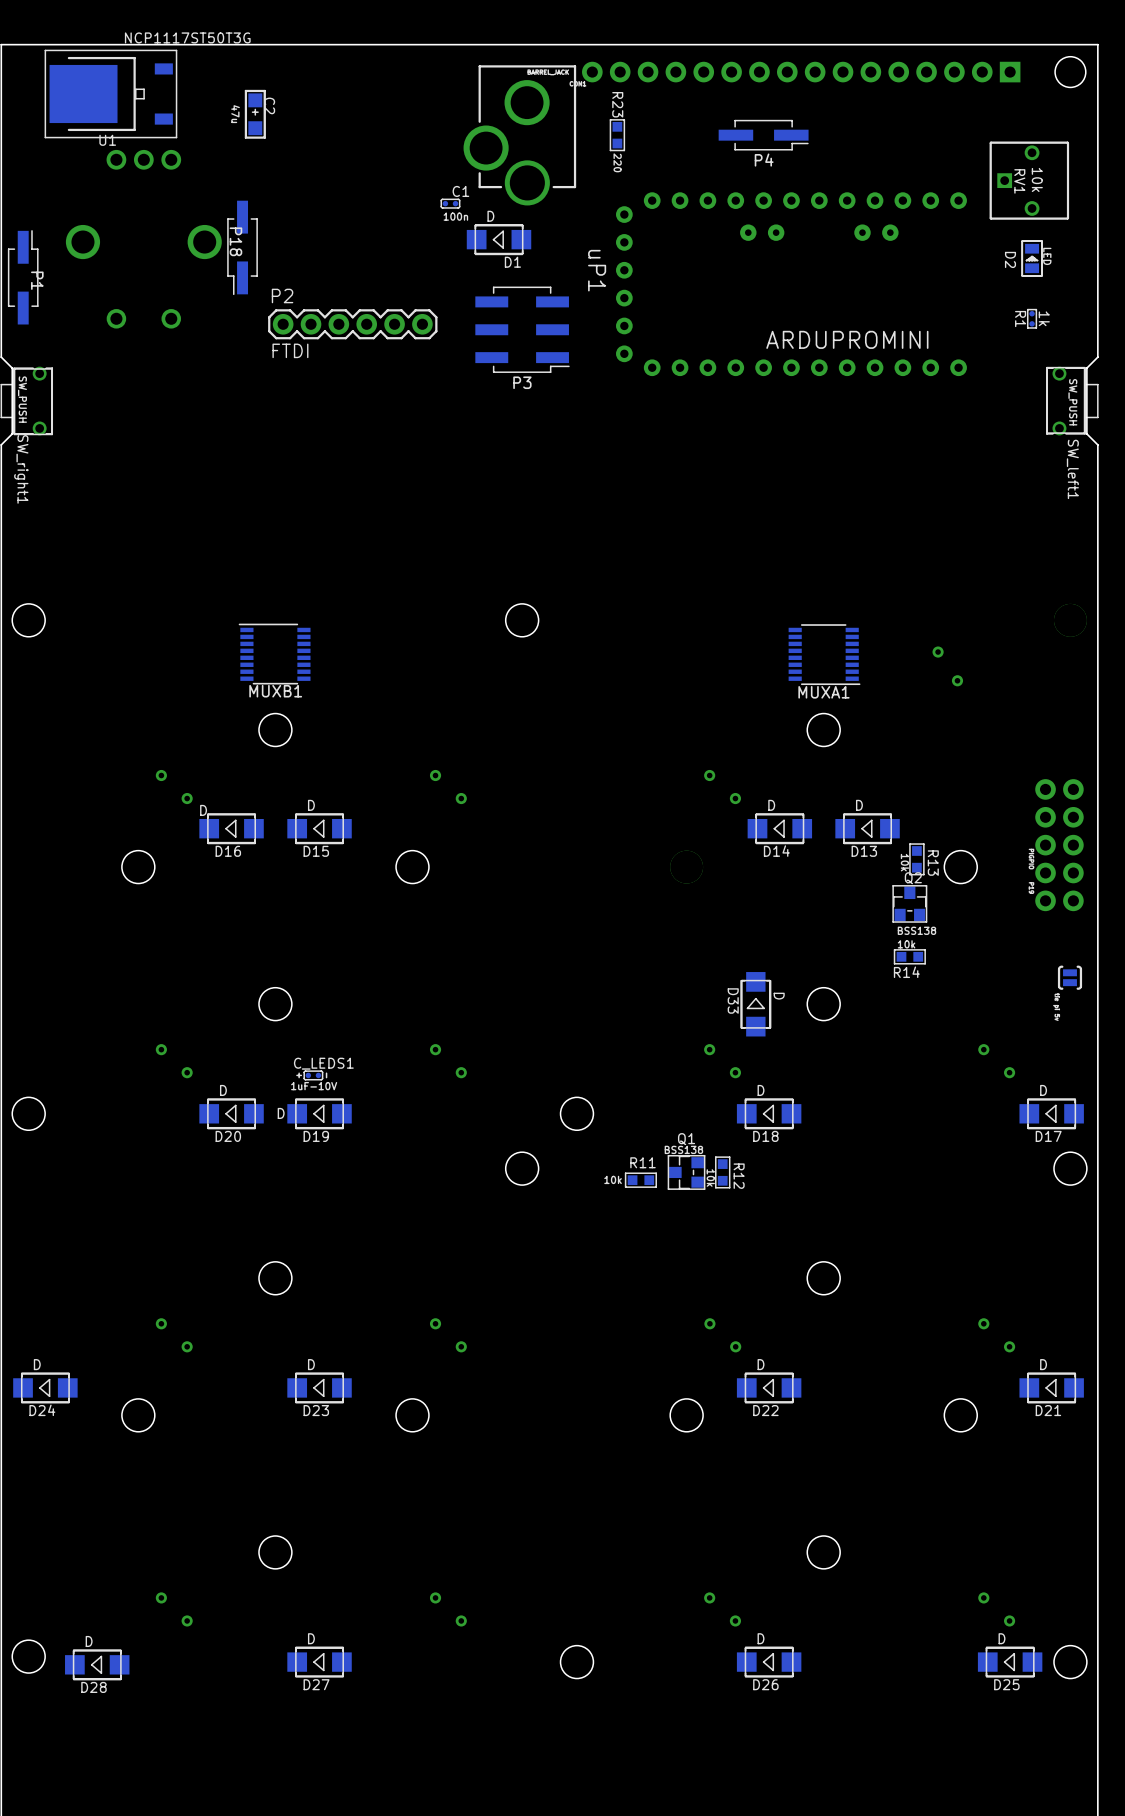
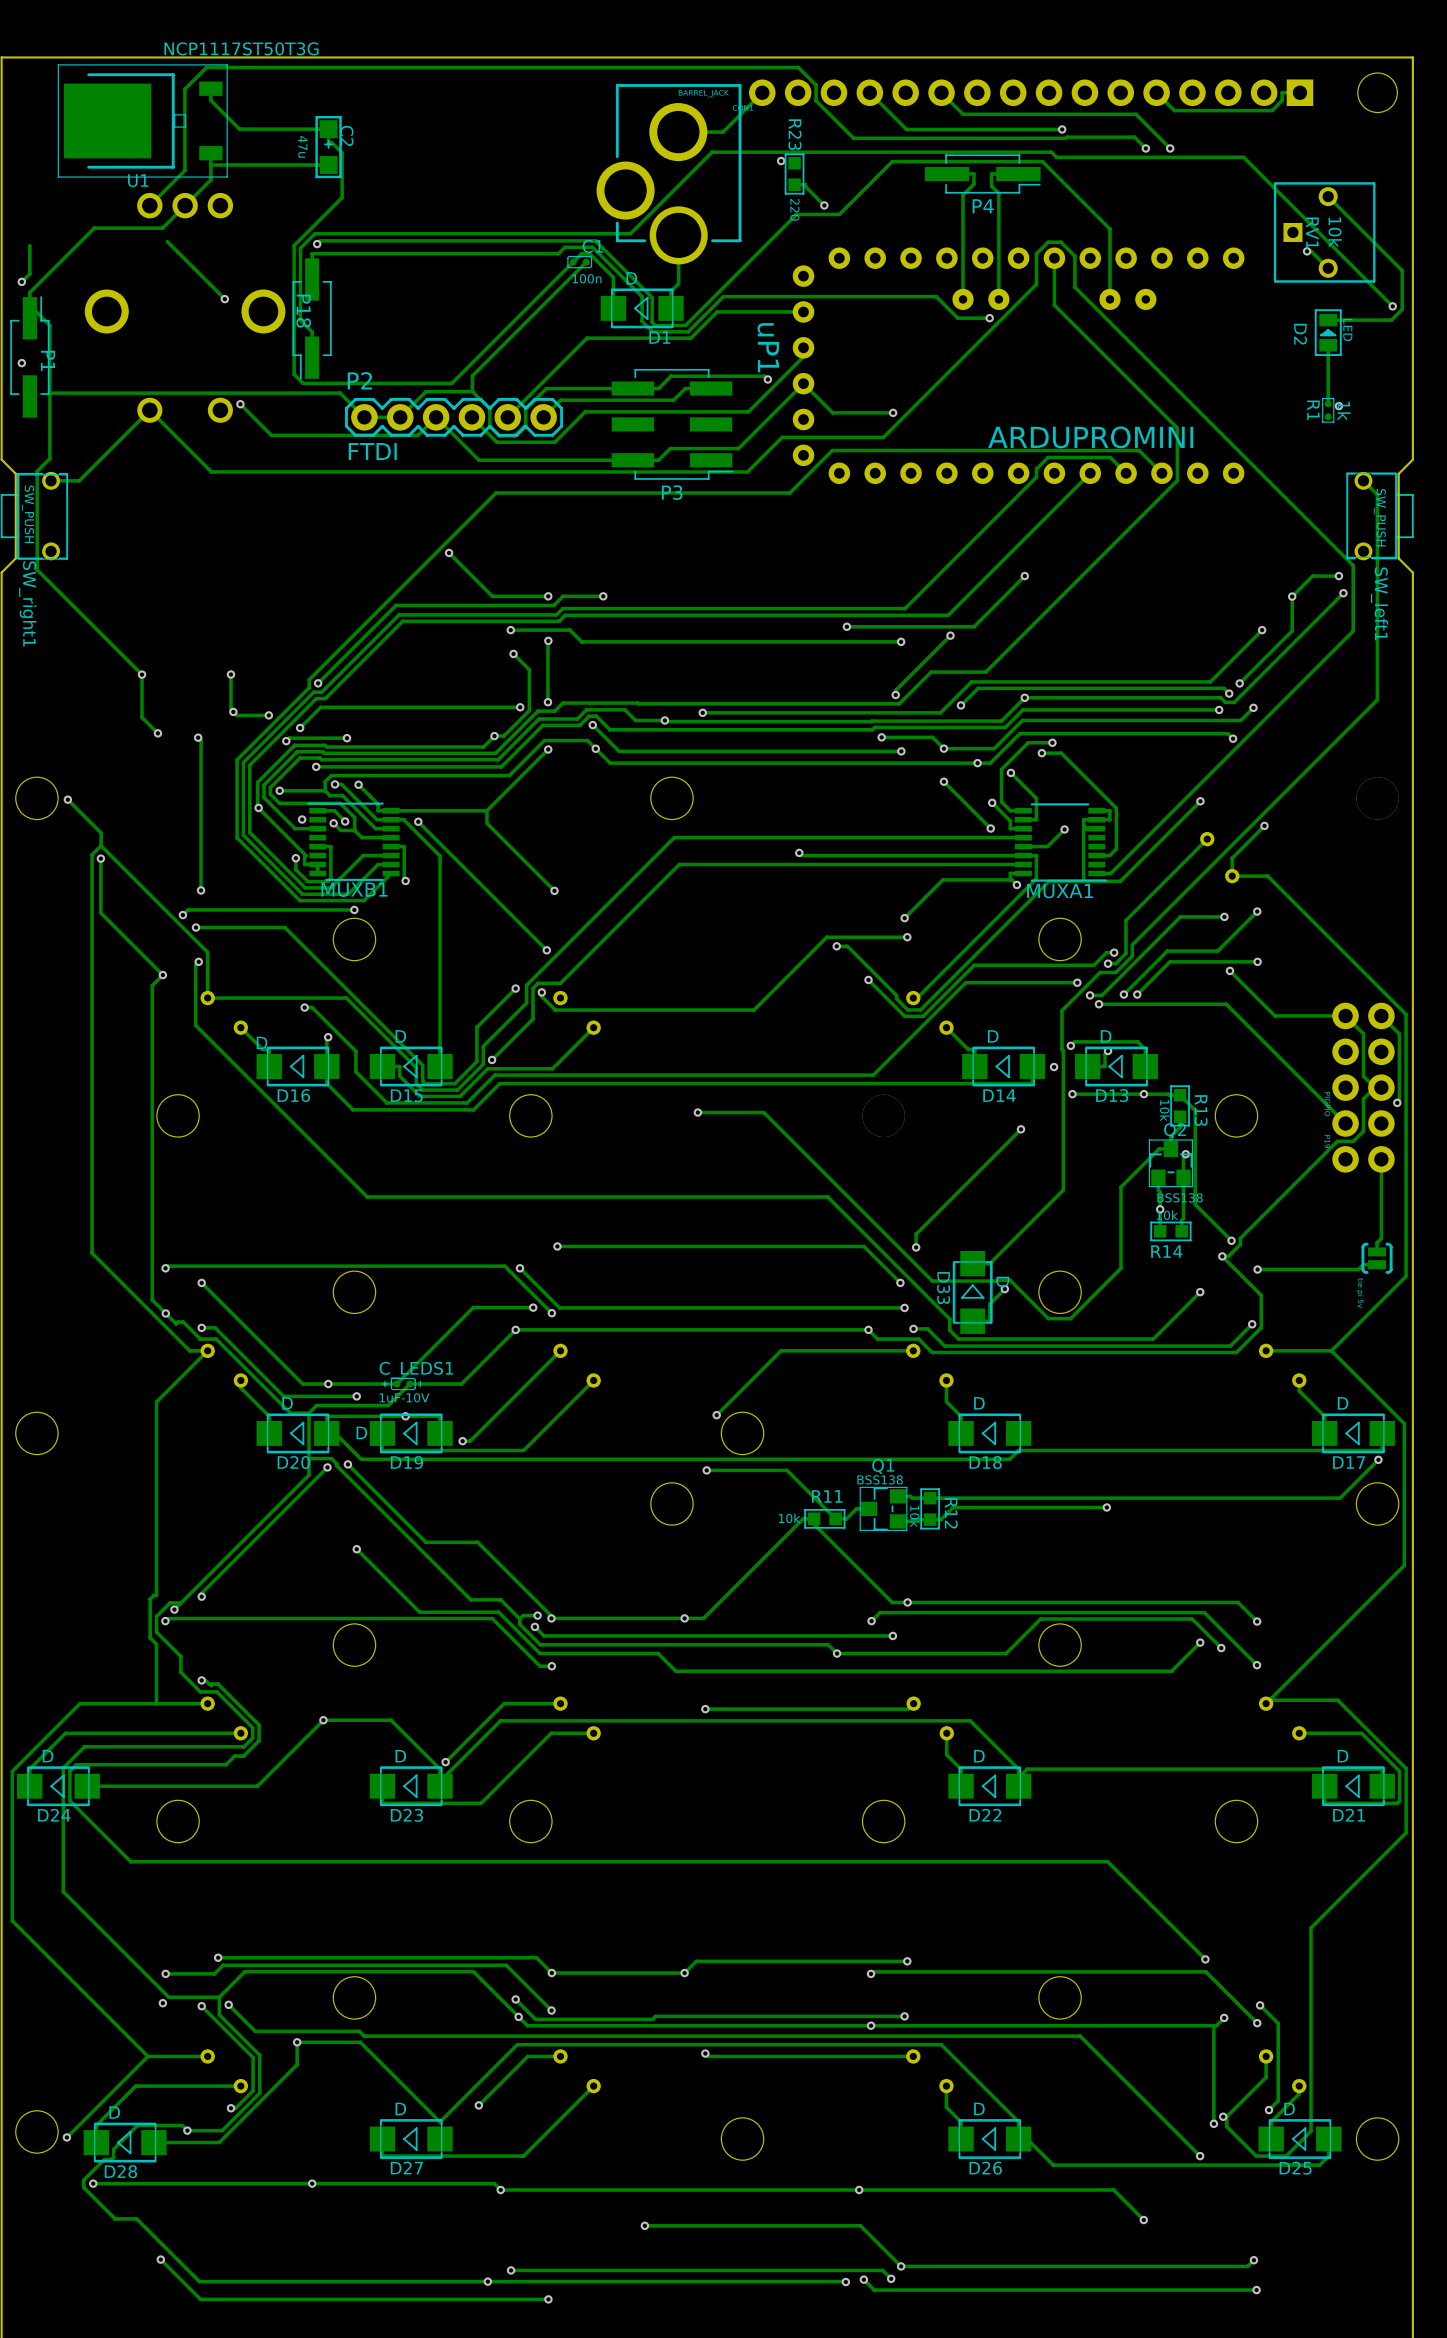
track: none -> (210, 88) (210, 100) (239, 129) (328, 129) (328, 142) (331, 142) (342, 152) (342, 197) (294, 245) (294, 374) (303, 383) (451, 383) (581, 253) (589, 253) (613, 277) (613, 308)
track: none -> (762, 92) (722, 132) (678, 132)
track: none -> (869, 92) (906, 129) (1062, 129)
track: none -> (941, 92) (963, 114) (1135, 114) (1170, 148)
track: none -> (1299, 92) (1282, 92) (1282, 100) (1272, 110) (1174, 110) (1156, 92)
via: none -> (1062, 129)
track: none -> (1145, 148) (1134, 137) (853, 138) (816, 100) (816, 85) (798, 67) (206, 67) (184, 89) (184, 170) (149, 205)
via: none -> (1145, 148)
via: none -> (1170, 148)
track: none -> (210, 153) (210, 179) (162, 228) (94, 228) (29, 292) (29, 318)
via: none -> (781, 161)
track: none -> (328, 165) (210, 165)
track: none -> (947, 173) (973, 173) (973, 184) (963, 195) (963, 299)
track: none -> (1018, 173) (991, 173) (991, 186) (998, 193) (998, 299)
track: none -> (794, 184) (805, 184) (824, 205)
track: none -> (1328, 196) (1402, 270) (1402, 309) (1391, 320) (1328, 320)
via: none -> (824, 205)
track: none -> (678, 235) (678, 283) (670, 291) (670, 308)
track: none -> (167, 241) (224, 299)
track: none -> (317, 244) (320, 240) (595, 240) (652, 297) (652, 322) (655, 325) (685, 325) (796, 214) (839, 214) (892, 161) (1042, 161) (1109, 229) (1109, 299)
via: none -> (317, 244)
track: none -> (29, 245) (29, 273) (21, 281)
track: none -> (1307, 251) (1311, 251) (1328, 268)
via: none -> (1307, 251)
track: none -> (1054, 258) (1054, 305) (1177, 428) (1177, 480) (985, 672) (931, 672) (899, 703) (562, 703) (554, 711) (537, 711) (495, 753) (297, 751) (264, 784) (264, 797) (295, 828) (317, 828)
track: none -> (586, 262) (472, 375) (472, 391)
track: none -> (312, 279) (312, 253) (558, 253) (564, 247) (592, 247) (642, 296) (642, 321) (652, 331) (688, 331) (723, 296) (936, 296) (957, 318) (989, 318)
via: none -> (21, 281)
via: none -> (224, 299)
track: none -> (29, 305) (49, 325) (49, 458) (37, 471) (37, 569) (142, 674) (142, 717) (157, 733)
track: none -> (1392, 306) (1243, 157) (1056, 157) (1051, 152) (712, 152) (630, 233) (315, 233) (300, 248) (300, 320) (312, 331) (312, 357)
via: none -> (1392, 306)
track: none -> (803, 311) (717, 311) (690, 338) (586, 338) (507, 417)
via: none -> (989, 318)
track: none -> (1328, 345) (1328, 403)
track: none -> (803, 347) (803, 356) (748, 411) (585, 411) (554, 442) (496, 442) (471, 417)
via: none -> (21, 363)
track: none -> (767, 379) (764, 376) (670, 376) (658, 388) (546, 388) (525, 409) (525, 424) (514, 435) (499, 435) (489, 426) (489, 409) (472, 391)
via: none -> (767, 379)
track: none -> (711, 388) (685, 388) (673, 400) (560, 400) (543, 417)
track: none -> (472, 391) (425, 391) (400, 417) (364, 417) (340, 393) (49, 393)
track: none -> (240, 404) (271, 435) (418, 435) (436, 417) (479, 460) (658, 460) (670, 448) (738, 448) (803, 383) (832, 412) (893, 412)
via: none -> (240, 404)
via: none -> (1338, 406)
via: none -> (893, 412)
track: none -> (1090, 473) (948, 615) (565, 615) (559, 621) (402, 621) (325, 698) (316, 698) (249, 765) (249, 832) (305, 887) (330, 887) (363, 855) (391, 855)
track: none -> (1126, 473) (1110, 457) (1048, 457) (1036, 469) (1036, 477) (905, 608) (562, 608) (556, 614) (399, 614) (321, 692) (313, 692) (243, 762) (243, 835) (302, 894) (348, 894) (378, 864) (391, 864)
track: none -> (1161, 473) (1139, 450) (832, 450) (789, 492) (495, 492) (309, 679) (309, 687) (237, 759) (237, 837) (299, 900) (364, 900) (391, 873)
track: none -> (51, 480) (79, 480) (149, 410) (211, 471) (747, 471) (782, 437) (883, 437) (1036, 284) (1036, 253) (1048, 242) (1060, 242) (1074, 256) (1074, 287) (1353, 565) (1353, 631) (1110, 873) (1096, 873)
track: none -> (1363, 480) (1377, 494) (1377, 699) (1132, 944) (1132, 956) (1115, 972) (1100, 972) (1061, 1010) (1063, 1190) (989, 1263) (972, 1263)
track: none -> (449, 552) (492, 596) (548, 596)
via: none -> (449, 552)
track: none -> (1024, 576) (974, 626) (846, 626)
via: none -> (1024, 576)
track: none -> (1338, 576) (1312, 576) (1292, 596) (1292, 630) (1239, 683)
via: none -> (1338, 576)
track: none -> (1343, 593) (1234, 702) (1225, 702) (1220, 697) (1024, 697) (1001, 721) (666, 721) (635, 720) (624, 709) (586, 709) (577, 718) (538, 718) (498, 759) (299, 758) (270, 787) (270, 794) (279, 803) (340, 803) (354, 817) (354, 830)
via: none -> (1343, 593)
via: none -> (548, 596)
track: none -> (603, 596) (562, 596) (553, 605) (396, 605) (318, 683)
via: none -> (603, 596)
via: none -> (1292, 596)
via: none -> (846, 626)
track: none -> (510, 630) (569, 630) (581, 641) (901, 641)
via: none -> (510, 630)
track: none -> (1262, 630) (1210, 681) (971, 681) (940, 712) (702, 712)
via: none -> (1262, 630)
track: none -> (950, 635) (895, 690) (895, 694)
via: none -> (950, 635)
track: none -> (548, 640) (547, 702)
via: none -> (548, 640)
via: none -> (901, 641)
track: none -> (513, 653) (529, 669) (529, 710) (503, 736) (494, 736) (483, 746) (294, 745) (257, 782) (257, 806) (305, 855) (304, 864) (317, 864) (317, 873)
via: none -> (513, 653)
via: none -> (142, 674)
track: none -> (230, 674) (230, 709) (236, 715) (268, 715)
via: none -> (230, 674)
via: none -> (318, 683)
via: none -> (1239, 683)
track: none -> (1229, 693) (1223, 688) (978, 688) (960, 705)
via: none -> (1229, 693)
via: none -> (895, 694)
via: none -> (1024, 697)
via: none -> (547, 702)
via: none -> (960, 705)
track: none -> (520, 707) (320, 707) (300, 727)
via: none -> (520, 707)
track: none -> (1253, 707) (1240, 720) (1022, 720) (994, 748) (943, 748) (932, 737) (881, 737)
via: none -> (1253, 707)
track: none -> (1219, 709) (1022, 709) (1005, 727) (874, 727) (872, 729) (610, 729) (596, 716) (589, 716) (579, 725) (542, 725) (501, 766) (316, 766)
via: none -> (1219, 709)
via: none -> (233, 711)
via: none -> (702, 712)
via: none -> (268, 715)
via: none -> (664, 720)
track: none -> (592, 725) (619, 751) (901, 751)
via: none -> (592, 725)
via: none -> (300, 727)
via: none -> (157, 733)
via: none -> (494, 736)
via: none -> (881, 737)
track: none -> (198, 737) (201, 740) (201, 890)
via: none -> (198, 737)
track: none -> (347, 738) (289, 738) (286, 741)
via: none -> (347, 738)
track: none -> (1233, 738) (1228, 733) (1019, 733) (990, 763) (610, 763) (587, 740) (544, 740) (509, 775) (331, 775) (325, 781) (325, 790)
via: none -> (1233, 738)
via: none -> (286, 741)
track: none -> (1052, 742) (1028, 742) (1001, 769) (1001, 801) (1010, 810) (1023, 810)
via: none -> (1052, 742)
via: none -> (595, 748)
via: none -> (943, 748)
track: none -> (548, 749) (486, 810)
via: none -> (548, 749)
via: none -> (901, 751)
track: none -> (1041, 753) (1061, 753) (1116, 808) (1116, 848) (1109, 855) (1096, 855)
via: none -> (1041, 753)
via: none -> (977, 763)
via: none -> (316, 766)
track: none -> (1010, 772) (1036, 798) (1036, 819) (1023, 819)
via: none -> (1010, 772)
track: none -> (943, 781) (990, 828)
via: none -> (943, 781)
track: none -> (335, 784) (341, 784) (377, 819) (404, 819) (440, 855) (440, 1066)
via: none -> (335, 784)
track: none -> (358, 784) (378, 804) (378, 810) (486, 810)
via: none -> (358, 784)
via: none -> (279, 790)
track: none -> (325, 790) (279, 790)
track: none -> (325, 790) (330, 795) (342, 795) (375, 828) (391, 828)
track: none -> (67, 799) (101, 832) (101, 845)
via: none -> (67, 799)
track: none -> (1200, 801) (1120, 881) (1049, 881) (920, 1009) (907, 1009) (896, 998) (896, 995) (847, 946) (836, 946)
via: none -> (1200, 801)
track: none -> (992, 802) (1010, 820) (1010, 828) (1023, 828)
via: none -> (992, 802)
via: none -> (258, 807)
track: none -> (317, 810) (334, 810) (345, 821)
track: none -> (486, 810) (486, 823) (554, 890)
track: none -> (1096, 810) (1109, 810) (1109, 819) (1083, 819) (1083, 825) (1086, 828)
via: none -> (302, 819)
via: none -> (345, 821)
track: none -> (418, 821) (546, 950)
via: none -> (418, 821)
track: none -> (333, 823) (340, 830) (354, 830)
via: none -> (333, 823)
track: none -> (1264, 825) (1232, 858) (1232, 876) (1267, 876) (1406, 1014) (1406, 1276) (1331, 1350)
via: none -> (1264, 825)
via: none -> (990, 828)
track: none -> (1096, 828) (1083, 828) (1083, 881)
track: none -> (1064, 829) (1047, 846) (1023, 846)
via: none -> (1064, 829)
track: none -> (354, 830) (361, 837) (391, 837)
track: none -> (1023, 837) (674, 837) (526, 985) (526, 1002) (483, 1046) (483, 1064) (457, 1090) (422, 1090) (416, 1083) (416, 1067) (346, 998) (207, 998) (207, 952) (101, 845)
track: none -> (1207, 839) (1125, 920) (1125, 953) (1115, 963) (1108, 963)
track: none -> (101, 845) (92, 854) (92, 1253) (189, 1350) (207, 1350) (156, 1402) (156, 1595) (150, 1599) (150, 1637) (156, 1644) (156, 1703)
track: none -> (317, 846) (330, 846) (330, 878) (327, 881) (307, 881) (295, 869) (295, 858)
track: none -> (391, 846) (404, 846) (405, 880)
track: none -> (799, 852) (801, 855) (1036, 855) (1036, 878) (917, 998) (913, 998)
via: none -> (799, 852)
via: none -> (295, 858)
track: none -> (100, 858) (100, 913) (162, 975) (152, 985) (152, 1299) (176, 1323) (183, 1322) (199, 1339) (216, 1339) (290, 1413) (309, 1413)
via: none -> (100, 858)
track: none -> (1023, 864) (679, 864) (560, 983) (538, 983) (533, 988) (533, 1019) (492, 1059)
track: none -> (1023, 873) (1010, 873) (1010, 879)
via: none -> (405, 880)
track: none -> (1016, 884) (1011, 879) (942, 879) (904, 918)
via: none -> (1016, 884)
via: none -> (201, 890)
via: none -> (554, 890)
track: none -> (354, 909) (188, 909) (182, 915)
via: none -> (354, 909)
track: none -> (1257, 911) (1217, 951) (1167, 951) (1123, 994)
via: none -> (1257, 911)
via: none -> (182, 915)
track: none -> (1224, 916) (1180, 916) (1102, 995) (1090, 995)
via: none -> (1224, 916)
via: none -> (904, 918)
track: none -> (196, 927) (284, 927) (422, 1065) (422, 1081) (425, 1083) (454, 1083) (476, 1061) (476, 1027) (515, 988)
via: none -> (196, 927)
track: none -> (907, 937) (826, 937) (754, 1010) (555, 1010) (541, 996) (541, 992)
via: none -> (907, 937)
via: none -> (836, 946)
via: none -> (546, 950)
track: none -> (1114, 952) (1106, 952) (1093, 965) (974, 965) (923, 1016) (904, 1016) (868, 979)
via: none -> (1114, 952)
track: none -> (198, 961) (195, 964) (195, 1025) (367, 1197) (827, 1197) (949, 1319) (949, 1330) (958, 1339) (1153, 1339) (1200, 1292)
via: none -> (198, 961)
track: none -> (1257, 961) (1169, 961) (1137, 994)
via: none -> (1257, 961)
via: none -> (1108, 963)
track: none -> (1229, 970) (1275, 1015) (1345, 1015) (1363, 1033) (1363, 1076) (1374, 1087)
via: none -> (1229, 970)
via: none -> (162, 975)
via: none -> (868, 979)
track: none -> (1077, 982) (965, 982) (873, 1075) (494, 1075) (467, 1102) (386, 1102) (355, 1071) (355, 1051) (312, 1007) (304, 1007)
via: none -> (1077, 982)
via: none -> (515, 988)
via: none -> (541, 992)
via: none -> (1123, 994)
via: none -> (1137, 994)
via: none -> (1090, 995)
track: none -> (1098, 1004) (1226, 1004) (1345, 1123)
via: none -> (1098, 1004)
via: none -> (304, 1007)
track: none -> (1381, 1015) (1399, 1033) (1399, 1100) (1397, 1102)
track: none -> (240, 1027) (262, 1049) (269, 1049) (269, 1066)
track: none -> (593, 1027) (552, 1068) (487, 1068) (460, 1096) (419, 1096) (399, 1076) (399, 1066) (382, 1066)
track: none -> (946, 1027) (968, 1049) (974, 1049) (974, 1066)
track: none -> (328, 1037) (326, 1083) (353, 1109) (473, 1109) (499, 1083) (1032, 1083) (1032, 1066)
via: none -> (328, 1037)
track: none -> (1070, 1045) (1074, 1041) (1137, 1041) (1145, 1049) (1145, 1066)
via: none -> (1070, 1045)
track: none -> (1108, 1051) (1105, 1054) (1105, 1066) (1087, 1066)
via: none -> (1108, 1051)
via: none -> (492, 1059)
via: none -> (1054, 1067)
track: none -> (1374, 1087) (1363, 1098) (1363, 1131) (1353, 1141) (1337, 1141) (1240, 1238) (1240, 1244) (1228, 1256) (1222, 1256) (1261, 1295) (1261, 1327) (1236, 1352) (932, 1352) (918, 1339) (877, 1339) (868, 1329) (515, 1329) (461, 1384) (409, 1384) (388, 1405) (316, 1405) (309, 1413)
track: none -> (1072, 1094) (1180, 1095) (1195, 1110) (1195, 1204) (1231, 1240)
via: none -> (1072, 1094)
via: none -> (1143, 1094)
via: none -> (1397, 1102)
track: none -> (697, 1112) (763, 1112) (932, 1281) (1009, 1280) (1048, 1318) (1070, 1318) (1120, 1268) (1120, 1187) (1159, 1148) (1170, 1148) (1170, 1136) (1180, 1127) (1180, 1116)
via: none -> (697, 1112)
track: none -> (1021, 1129) (916, 1234) (916, 1247)
via: none -> (1021, 1129)
track: none -> (1185, 1154) (1183, 1156) (1181, 1231)
via: none -> (1185, 1154)
track: none -> (1381, 1159) (1381, 1238) (1377, 1242) (1377, 1251)
track: none -> (1158, 1177) (1160, 1231)
via: none -> (1160, 1209)
via: none -> (1231, 1240)
track: none -> (557, 1246) (863, 1246) (900, 1282)
via: none -> (557, 1246)
via: none -> (916, 1247)
via: none -> (1222, 1256)
track: none -> (1377, 1264) (1363, 1264) (1358, 1269) (1257, 1269)
track: none -> (165, 1268) (167, 1266) (504, 1266) (551, 1313)
via: none -> (165, 1268)
track: none -> (520, 1268) (559, 1307) (904, 1307)
via: none -> (520, 1268)
via: none -> (1257, 1269)
track: none -> (201, 1282) (302, 1384) (396, 1384) (473, 1307) (533, 1307)
via: none -> (201, 1282)
via: none -> (900, 1282)
track: none -> (1004, 1289) (989, 1304) (989, 1321) (972, 1321)
via: none -> (1004, 1289)
via: none -> (1200, 1292)
via: none -> (533, 1307)
via: none -> (904, 1307)
via: none -> (165, 1313)
via: none -> (551, 1313)
track: none -> (1252, 1324) (1230, 1346) (944, 1346) (927, 1328) (913, 1328)
via: none -> (1252, 1324)
track: none -> (201, 1327) (215, 1327) (283, 1396) (356, 1396)
via: none -> (201, 1327)
via: none -> (913, 1328)
via: none -> (515, 1329)
via: none -> (868, 1329)
track: none -> (560, 1350) (470, 1441) (462, 1441)
track: none -> (913, 1350) (781, 1350) (716, 1415)
track: none -> (1331, 1350) (1266, 1350)
track: none -> (1331, 1350) (1404, 1423) (1404, 1565) (1266, 1703)
track: none -> (240, 1380) (240, 1387) (269, 1416) (269, 1433)
track: none -> (593, 1380) (523, 1450) (382, 1450) (382, 1433)
track: none -> (946, 1380) (946, 1401) (961, 1416) (961, 1433)
track: none -> (1299, 1380) (1299, 1390) (1324, 1416) (1324, 1433)
via: none -> (328, 1384)
via: none -> (356, 1396)
track: none -> (309, 1413) (309, 1475) (174, 1609)
via: none -> (716, 1415)
via: none -> (405, 1416)
track: none -> (326, 1424) (361, 1459) (1009, 1459) (1018, 1450) (1382, 1450) (1382, 1433)
track: none -> (440, 1433) (440, 1416) (326, 1416) (326, 1433)
via: none -> (462, 1441)
track: none -> (309, 1458) (331, 1458) (470, 1599) (500, 1599) (519, 1618)
track: none -> (1378, 1459) (1340, 1498) (912, 1498) (910, 1496) (897, 1496)
via: none -> (1378, 1459)
track: none -> (347, 1464) (425, 1542) (477, 1542) (551, 1616) (551, 1618) (703, 1618) (803, 1518) (814, 1518)
via: none -> (347, 1464)
track: none -> (327, 1467) (201, 1593) (201, 1596)
via: none -> (327, 1467)
track: none -> (706, 1470) (787, 1470) (835, 1518) (846, 1518) (856, 1508) (869, 1508)
via: none -> (706, 1470)
track: none -> (1106, 1507) (953, 1507) (940, 1519) (897, 1521)
via: none -> (1106, 1507)
track: none -> (808, 1518) (892, 1602) (1238, 1602) (1257, 1621)
track: none -> (356, 1549) (419, 1612) (498, 1612) (540, 1653) (658, 1653) (675, 1671) (1171, 1671) (1200, 1642)
via: none -> (356, 1549)
via: none -> (201, 1596)
track: none -> (181, 1602) (170, 1602) (156, 1616) (156, 1632) (180, 1656) (180, 1672) (200, 1691) (216, 1691) (252, 1727) (252, 1738) (244, 1746) (84, 1746) (63, 1768) (63, 1891) (168, 1997) (219, 1997)
via: none -> (907, 1602)
via: none -> (174, 1609)
track: none -> (537, 1615) (523, 1615) (519, 1618)
via: none -> (537, 1615)
track: none -> (519, 1618) (519, 1624) (540, 1644) (828, 1644) (837, 1653) (1006, 1653) (1040, 1619) (1192, 1619) (1221, 1648)
via: none -> (551, 1618)
via: none -> (684, 1618)
track: none -> (165, 1621) (167, 1618) (492, 1618) (540, 1666) (551, 1666)
via: none -> (165, 1621)
track: none -> (871, 1621) (880, 1612) (1204, 1612) (1256, 1665)
via: none -> (871, 1621)
via: none -> (1257, 1621)
track: none -> (534, 1626) (544, 1635) (892, 1635)
via: none -> (534, 1626)
via: none -> (892, 1635)
via: none -> (1200, 1642)
via: none -> (1221, 1648)
via: none -> (837, 1653)
via: none -> (1256, 1665)
via: none -> (551, 1666)
track: none -> (201, 1680) (205, 1680) (211, 1685) (218, 1684) (259, 1725) (259, 1740) (243, 1756) (234, 1756) (226, 1764) (76, 1764) (69, 1771) (69, 1800) (130, 1861) (1107, 1861) (1205, 1959)
via: none -> (201, 1680)
track: none -> (1269, 1700) (1337, 1700) (1406, 1768) (1406, 1832) (1311, 1927) (1311, 2131) (1286, 2156) (1256, 2156) (1226, 2126) (1226, 2116)
track: none -> (207, 1703) (80, 1703) (12, 1771) (12, 1920) (147, 2056)
track: none -> (560, 1703) (504, 1703) (445, 1762)
track: none -> (913, 1703) (908, 1709) (705, 1709)
via: none -> (705, 1709)
via: none -> (323, 1720)
track: none -> (240, 1733) (65, 1733) (29, 1769) (29, 1786)
track: none -> (593, 1733) (551, 1733) (481, 1803) (382, 1803) (382, 1786)
track: none -> (946, 1733) (946, 1754) (961, 1769) (961, 1786)
track: none -> (1299, 1733) (1361, 1733) (1399, 1771) (1399, 1801) (1397, 1803) (1324, 1803) (1324, 1786)
via: none -> (445, 1762)
track: none -> (440, 1777) (443, 1777) (500, 1720) (970, 1720) (1018, 1769) (1018, 1786)
track: none -> (1018, 1777) (1027, 1769) (1382, 1769) (1382, 1786)
track: none -> (440, 1786) (440, 1769) (391, 1720) (323, 1720) (257, 1786) (87, 1786)
track: none -> (218, 1957) (536, 1957) (551, 1973) (684, 1973) (696, 1961) (907, 1961)
via: none -> (218, 1957)
via: none -> (1205, 1959)
via: none -> (907, 1961)
track: none -> (165, 1973) (214, 1973) (223, 1965) (506, 1965) (551, 2010)
via: none -> (165, 1973)
via: none -> (551, 1973)
via: none -> (684, 1973)
track: none -> (871, 1973) (873, 1971) (1206, 1971) (1257, 2023)
via: none -> (871, 1973)
track: none -> (219, 1997) (219, 2014) (259, 2055) (259, 2093) (222, 2130) (187, 2130) (182, 2125) (137, 2125) (113, 2149) (113, 2157) (111, 2159) (104, 2159) (83, 2180) (83, 2187) (115, 2218) (136, 2218) (199, 2281) (845, 2282)
track: none -> (219, 1997) (244, 1971) (473, 1971) (527, 2025) (1216, 2025) (1224, 2017)
track: none -> (515, 1999) (535, 2019) (652, 2019) (655, 2016) (904, 2016)
via: none -> (515, 1999)
via: none -> (162, 2003)
track: none -> (228, 2004) (255, 2031) (359, 2031) (364, 2036) (1080, 2036) (1200, 2156)
via: none -> (228, 2004)
track: none -> (201, 2006) (253, 2057) (253, 2090) (235, 2108) (230, 2108)
via: none -> (201, 2006)
track: none -> (1260, 2005) (1278, 2023) (1278, 2100) (1268, 2110)
via: none -> (1260, 2005)
via: none -> (551, 2010)
via: none -> (904, 2016)
via: none -> (518, 2016)
via: none -> (1224, 2017)
via: none -> (1257, 2023)
via: none -> (871, 2025)
track: none -> (1213, 2025) (1213, 2123)
via: none -> (297, 2042)
track: none -> (705, 2053) (708, 2056) (913, 2056)
via: none -> (705, 2053)
track: none -> (147, 2056) (66, 2137)
track: none -> (207, 2056) (147, 2056)
track: none -> (560, 2056) (527, 2056) (478, 2105)
track: none -> (1266, 2056) (1266, 2077) (1226, 2116)
track: none -> (240, 2086) (135, 2086) (96, 2125) (96, 2142)
track: none -> (593, 2086) (523, 2156) (382, 2156) (382, 2139)
track: none -> (946, 2086) (946, 2107) (961, 2121) (961, 2139)
track: none -> (1299, 2086) (1299, 2093) (1271, 2121) (1271, 2139)
via: none -> (478, 2105)
via: none -> (230, 2108)
via: none -> (1268, 2110)
via: none -> (1223, 2116)
via: none -> (1213, 2123)
via: none -> (187, 2130)
track: none -> (1018, 2130) (1053, 2165) (1319, 2165) (1328, 2156) (1328, 2139)
via: none -> (66, 2137)
track: none -> (1018, 2139) (1018, 2121) (941, 2044) (517, 2044) (440, 2121) (360, 2042) (297, 2042) (297, 2064) (219, 2142) (153, 2142)
via: none -> (1200, 2156)
track: none -> (93, 2183) (494, 2183) (500, 2189) (1113, 2189) (1143, 2220)
via: none -> (93, 2183)
via: none -> (312, 2183)
via: none -> (500, 2189)
via: none -> (859, 2189)
via: none -> (1143, 2220)
track: none -> (644, 2225) (860, 2225) (901, 2266) (1247, 2266) (1253, 2260)
via: none -> (644, 2225)
track: none -> (160, 2259) (200, 2299) (548, 2299)
via: none -> (160, 2259)
via: none -> (1253, 2260)
via: none -> (901, 2266)
track: none -> (511, 2270) (882, 2270) (891, 2278)
via: none -> (511, 2270)
via: none -> (891, 2278)
track: none -> (863, 2279) (874, 2290) (1256, 2290)
via: none -> (863, 2279)
via: none -> (487, 2281)
via: none -> (845, 2282)
via: none -> (1256, 2290)
via: none -> (548, 2299)

